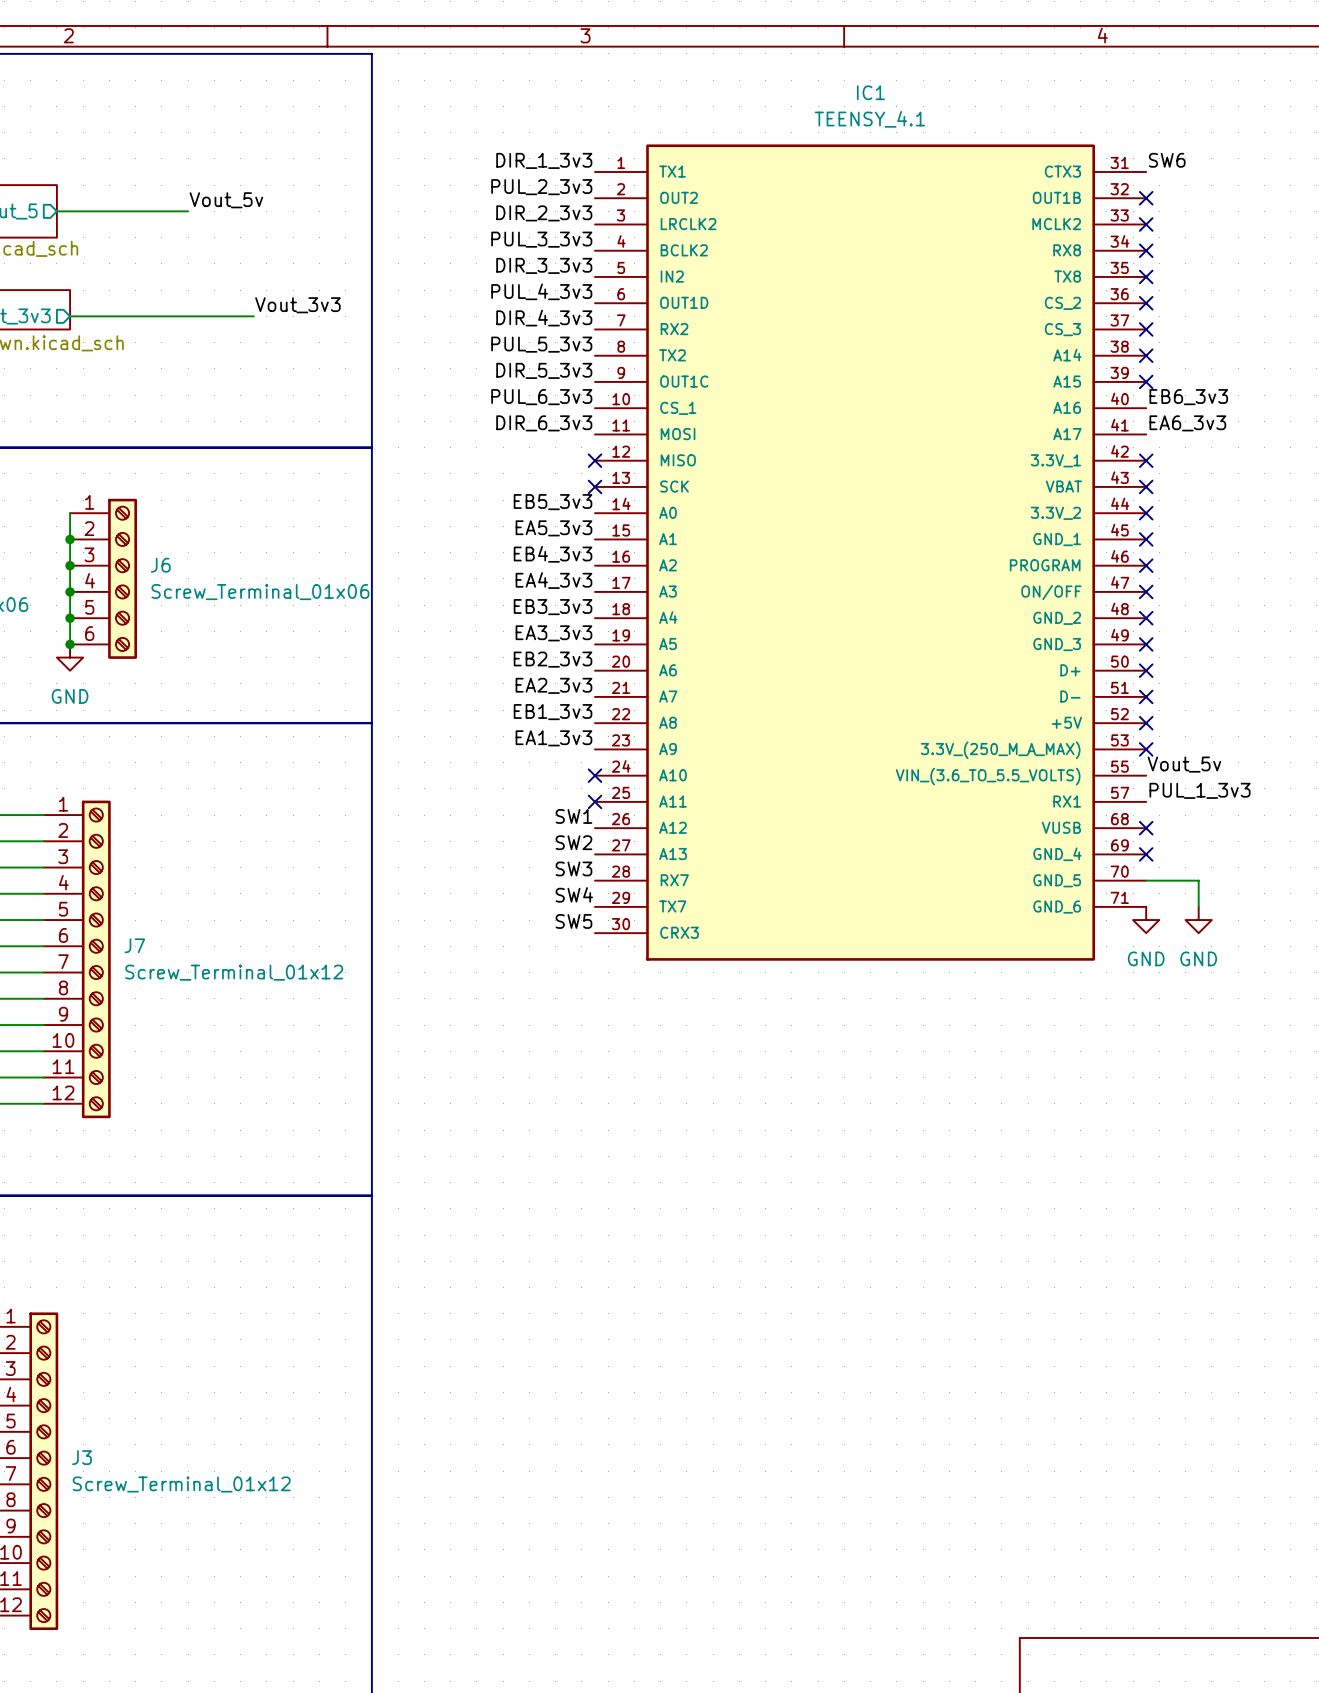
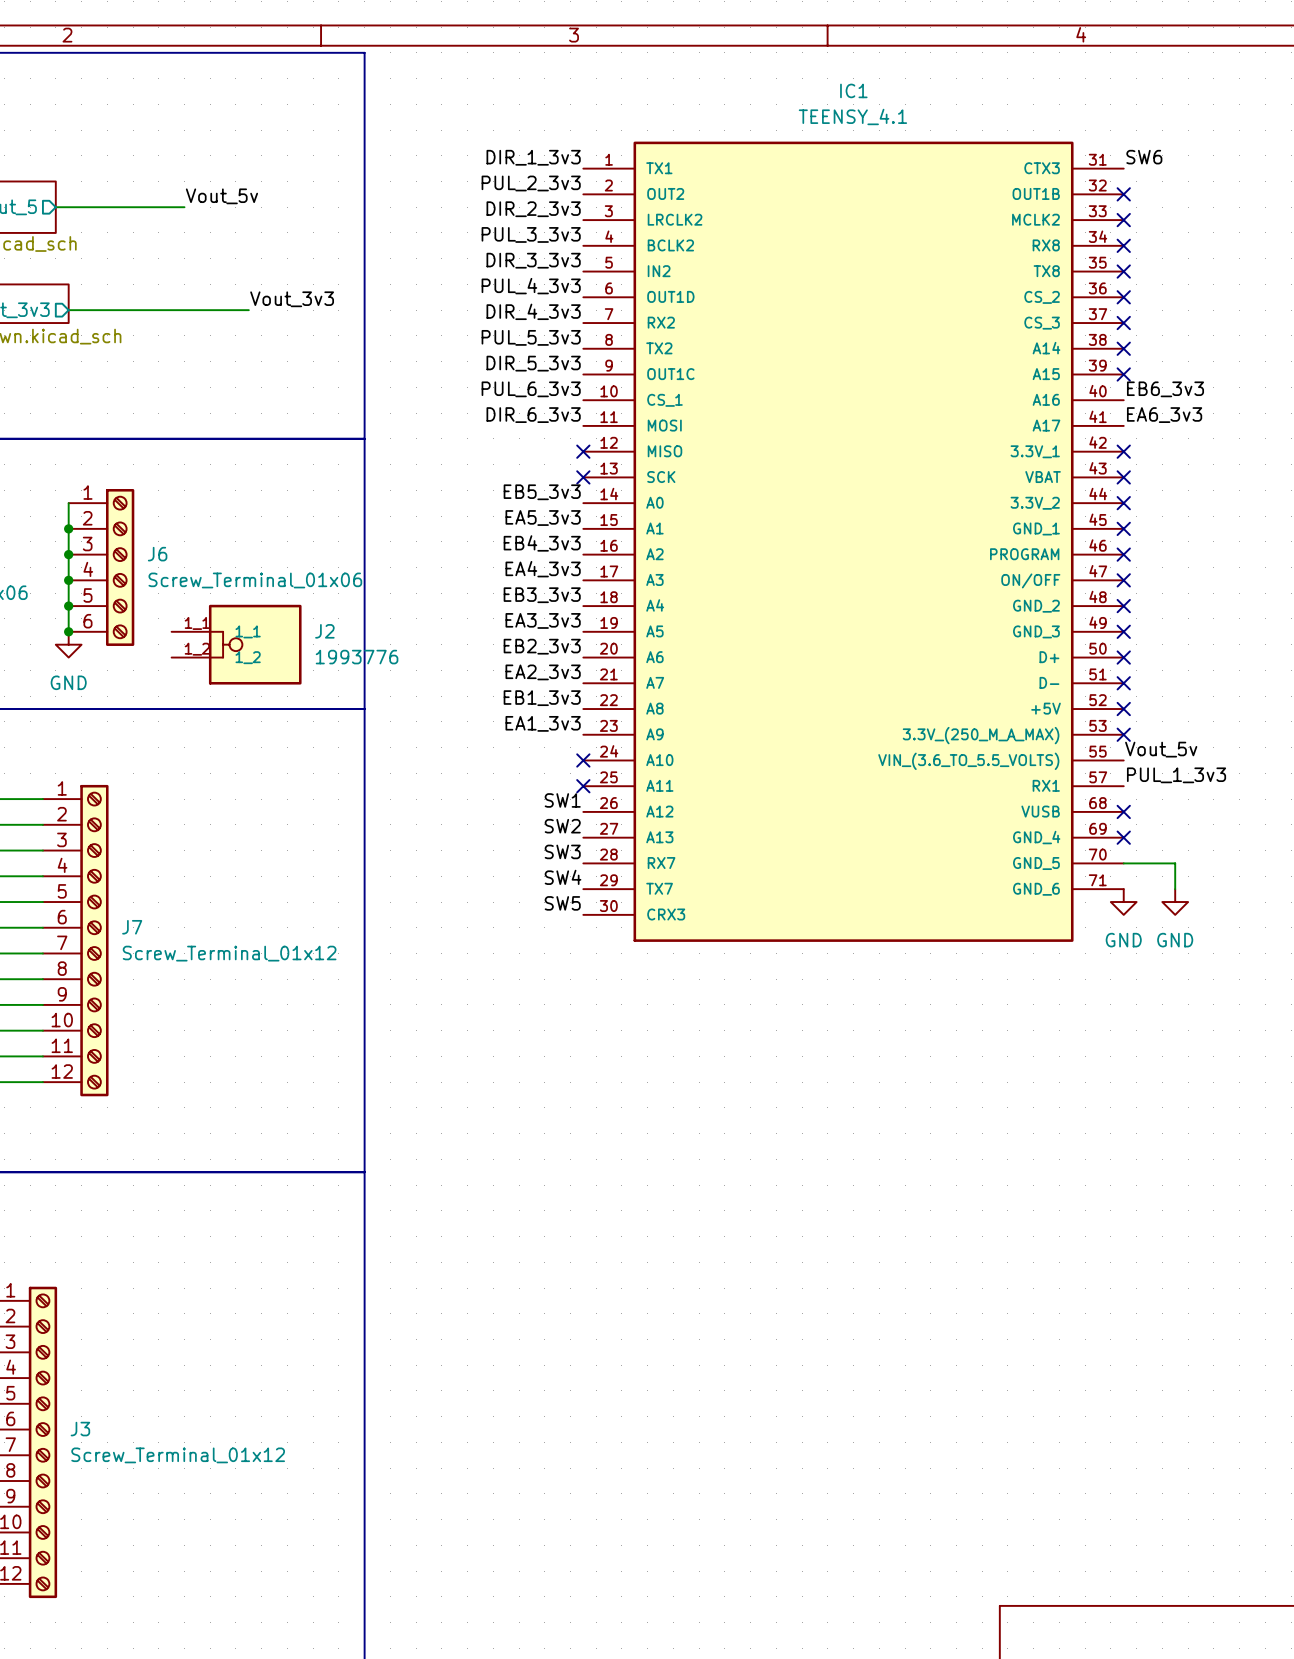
J2: none -> 1993776 (236, 644)

